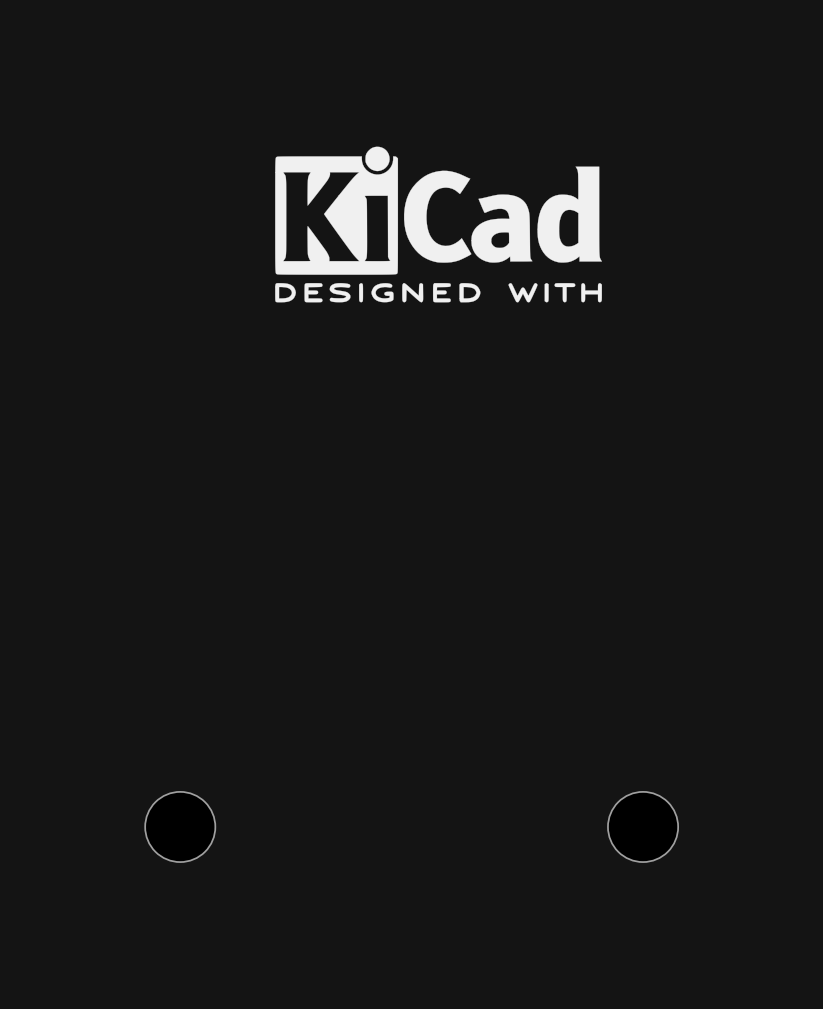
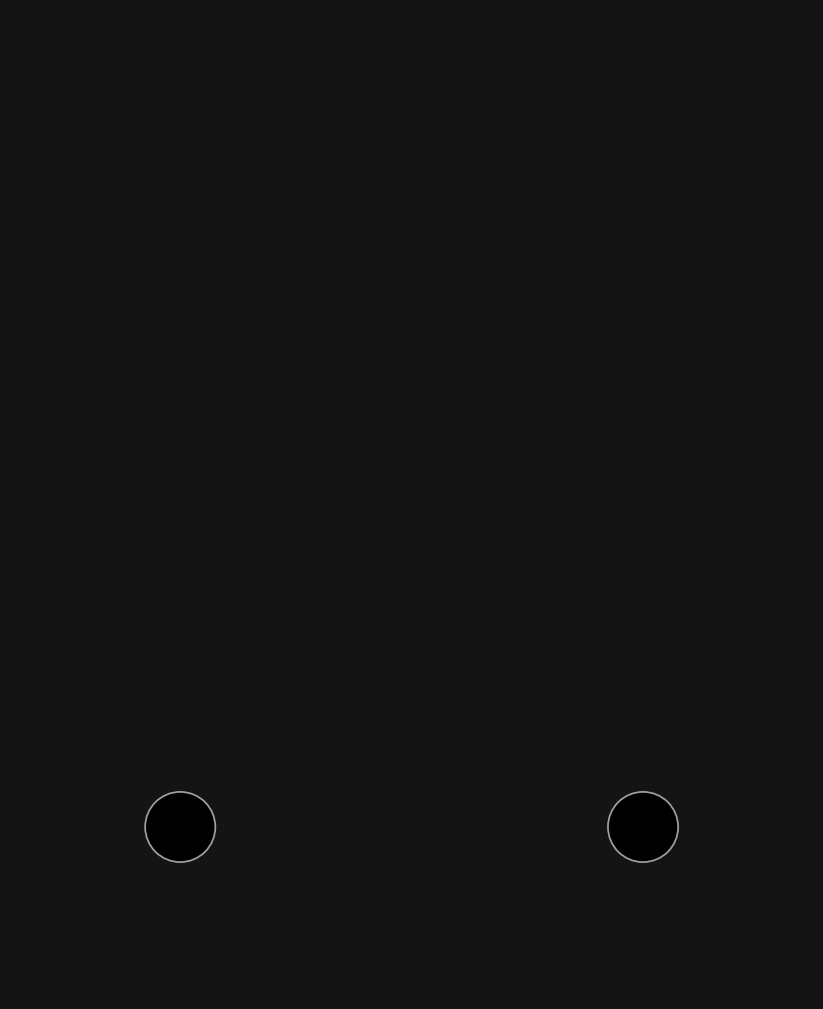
drawing: [275, 146, 602, 303] -> none

